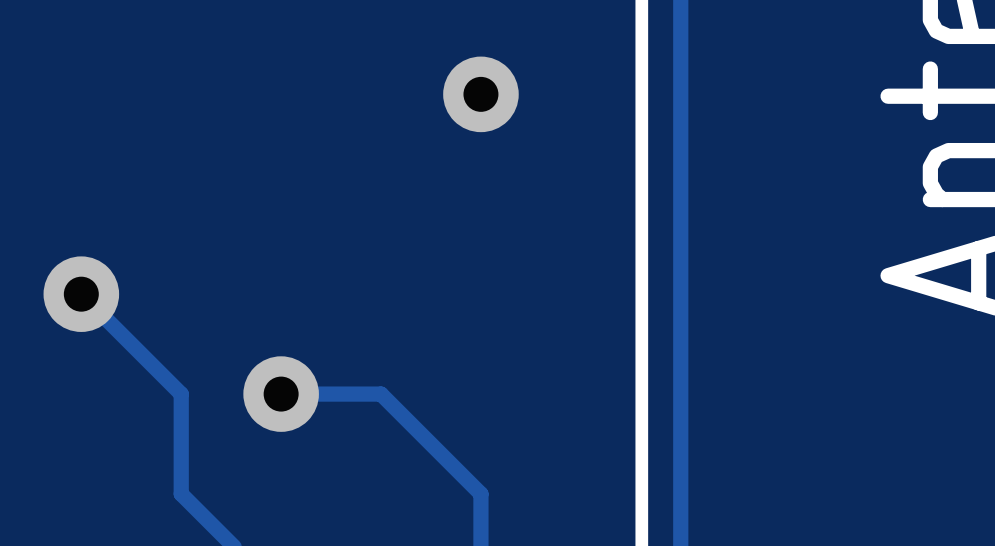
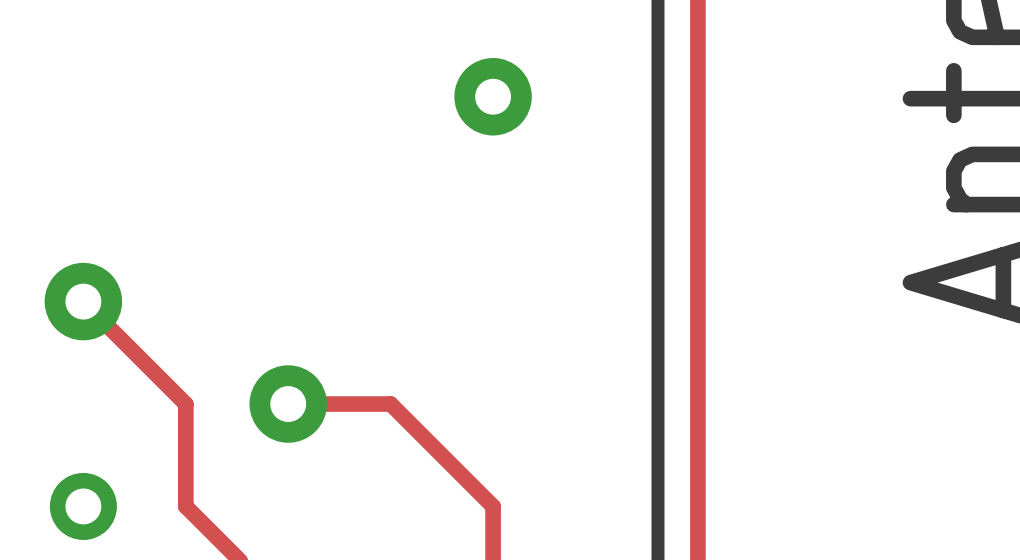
via: none -> (83, 506)

